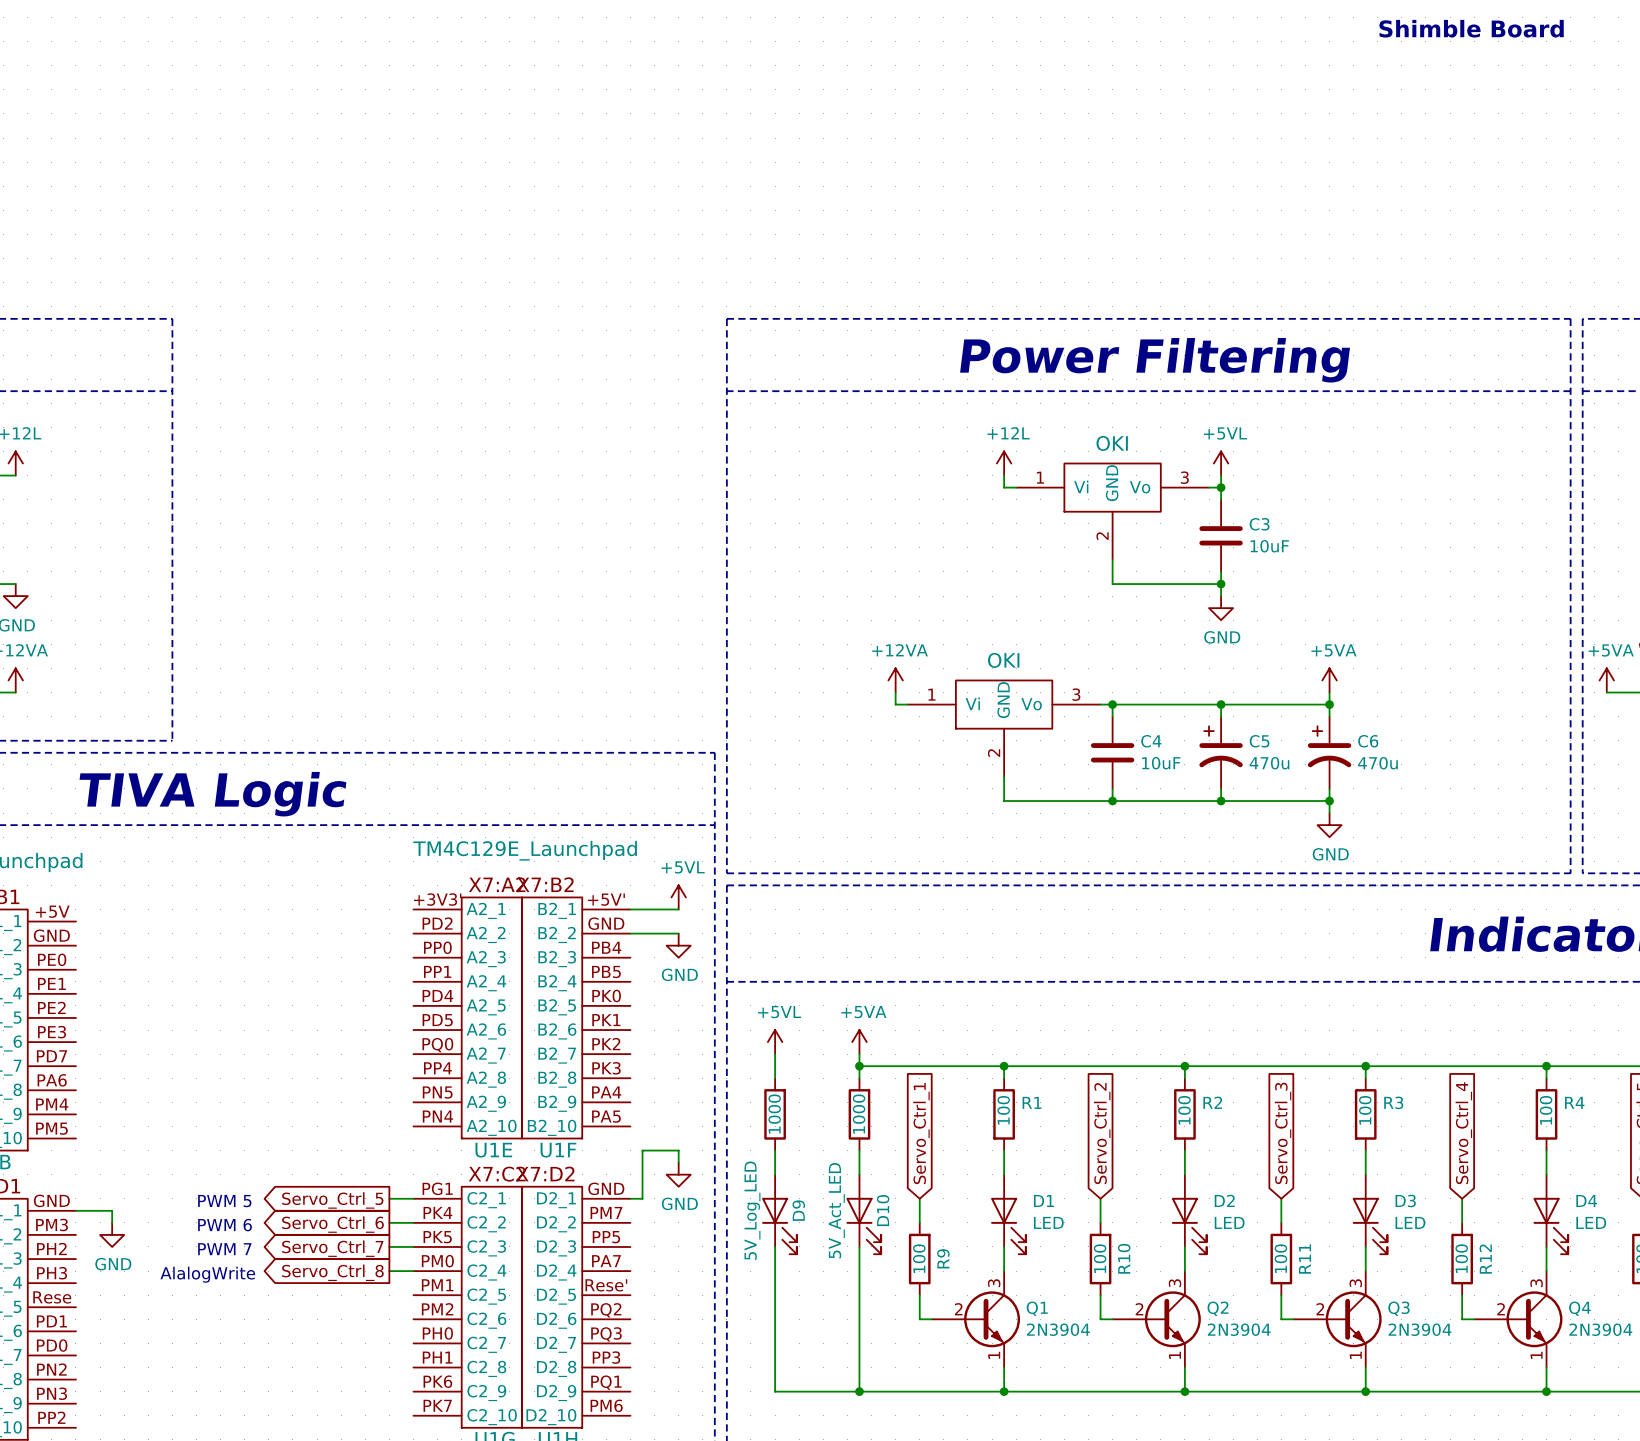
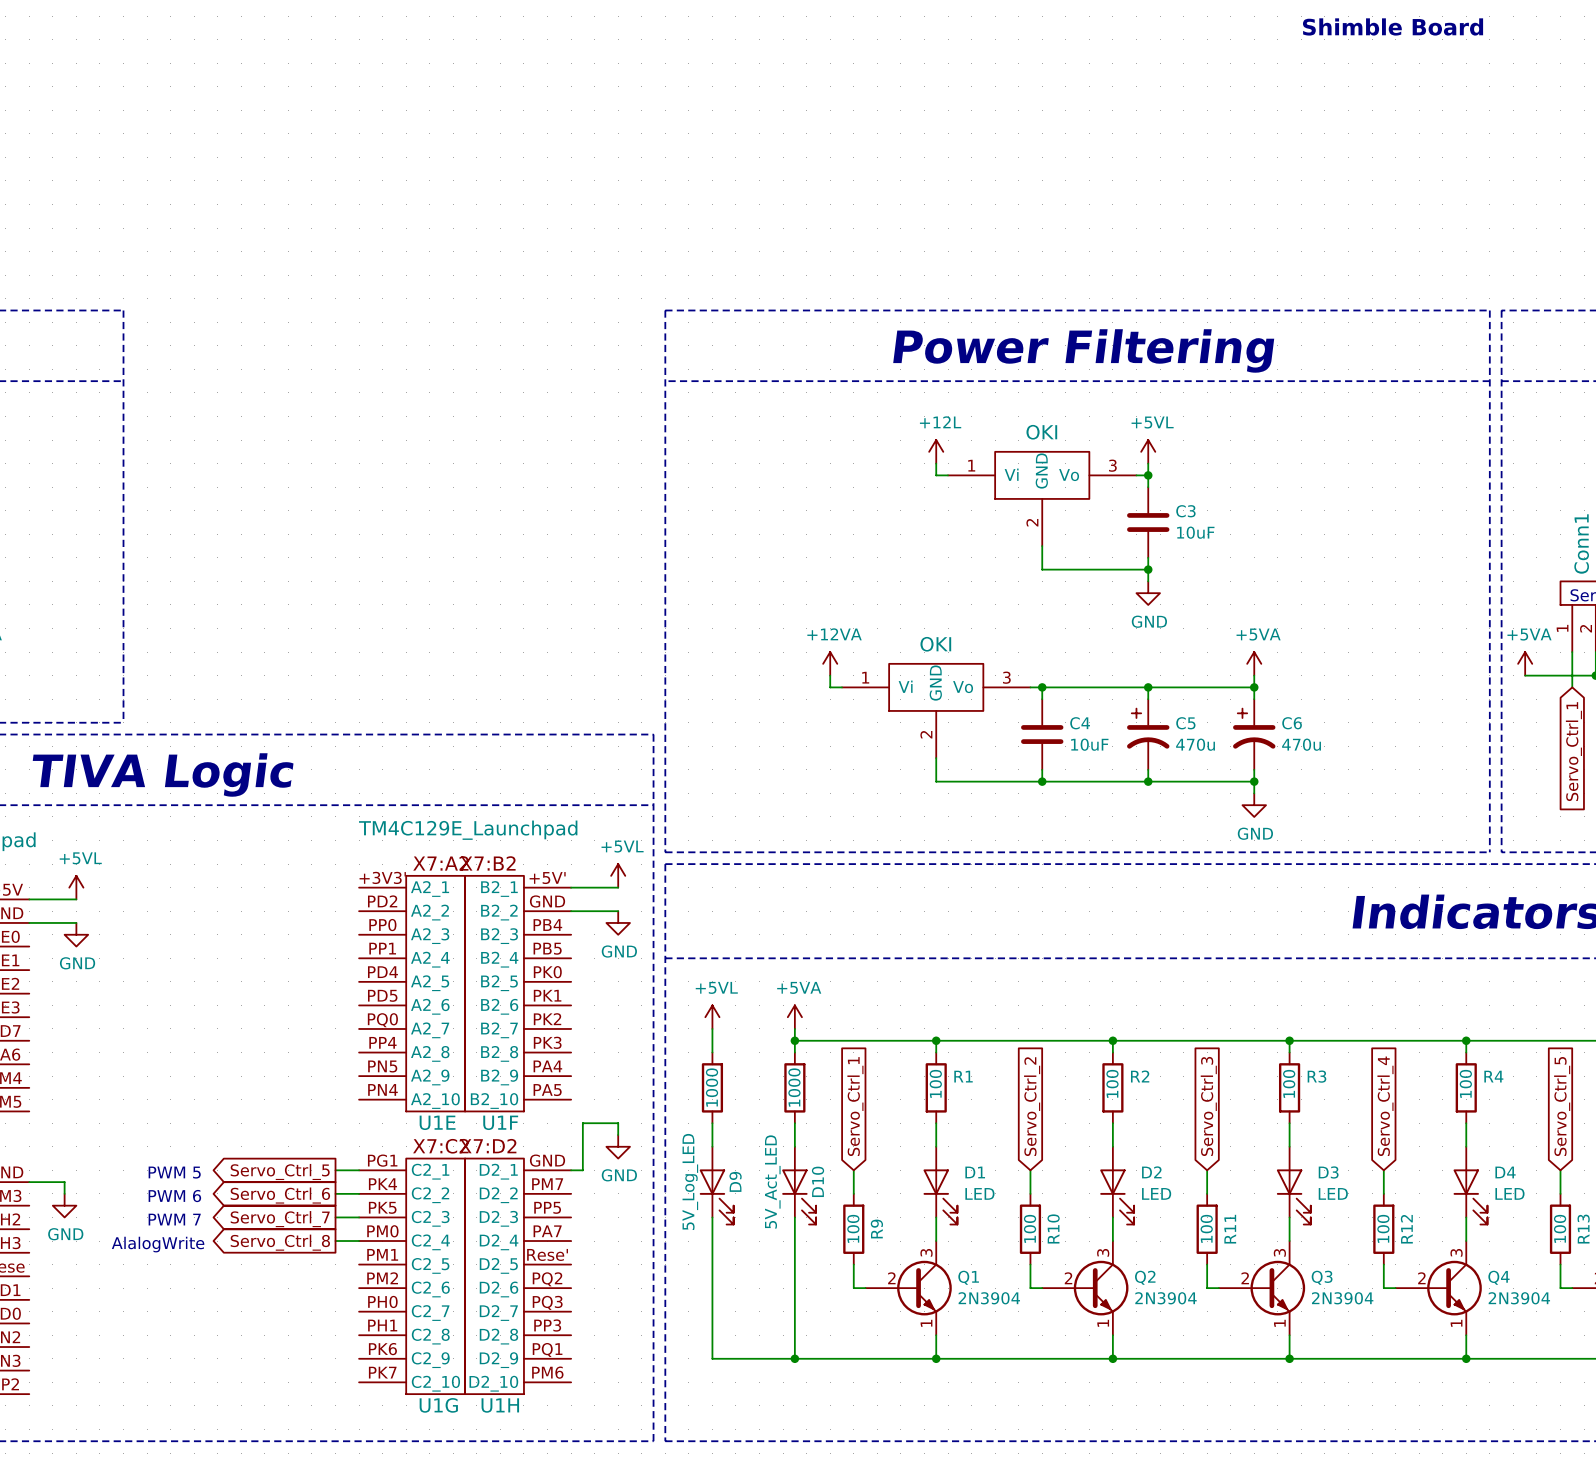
power symbol: none -> +5VL (76, 887)
wire: none -> (29, 899) (76, 899)
wire: none -> (29, 922) (76, 922)
power symbol: none -> GND (76, 934)

